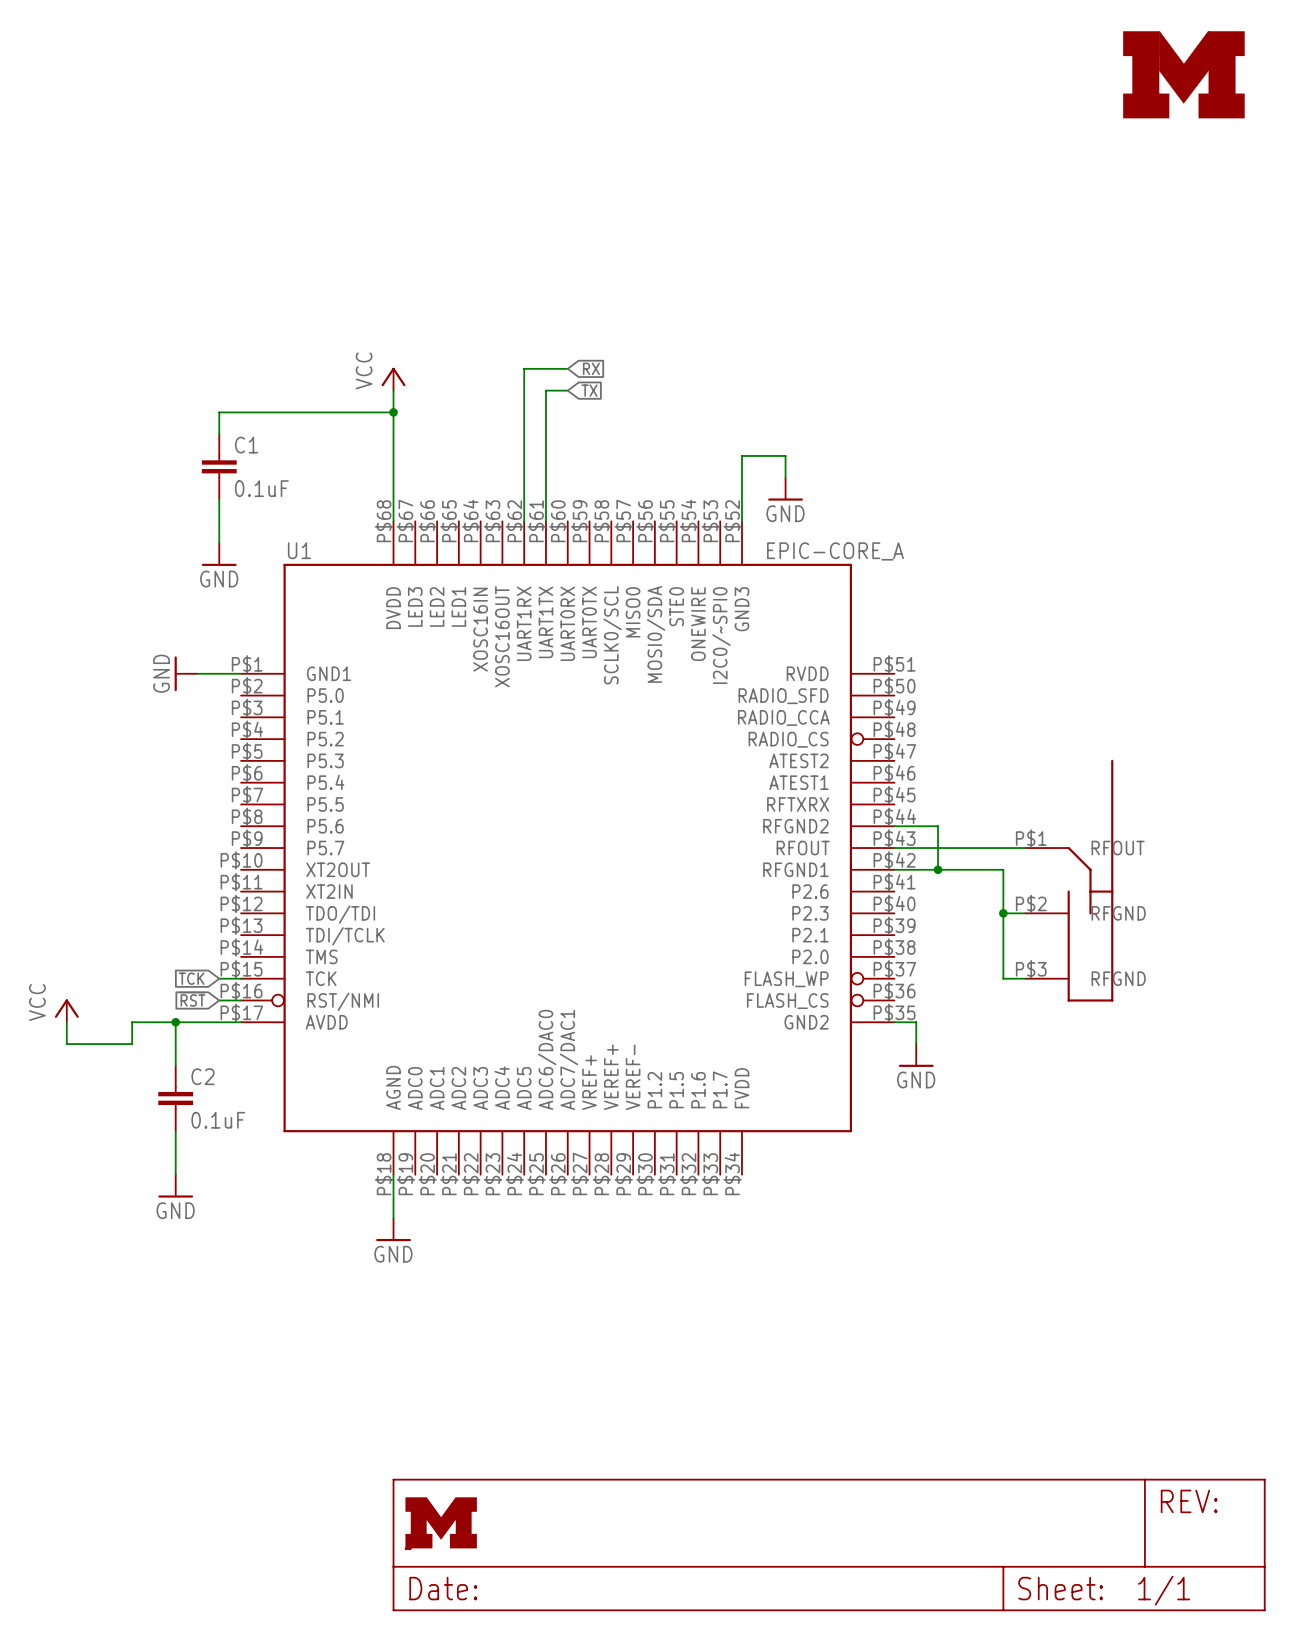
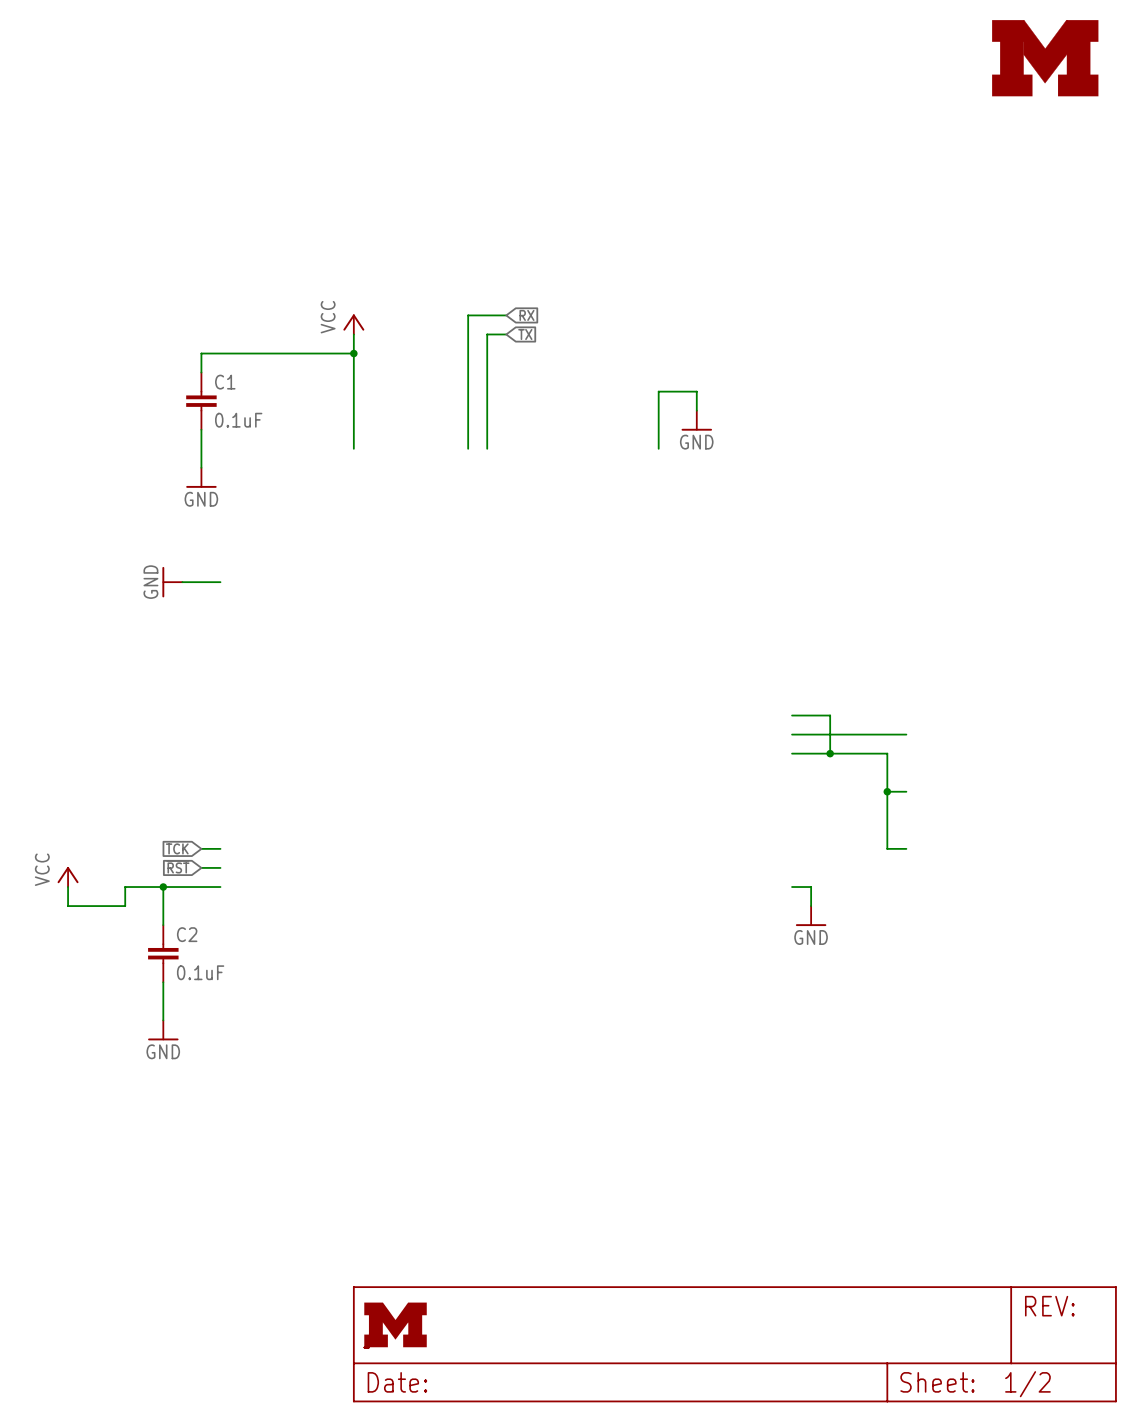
U1: EPIC-CORE_A (567, 848) -> none
part: (1069, 880) -> none
wire: (393, 1174) (393, 1218) -> none
power symbol: GND (393, 1229) -> none
part text: 1/1 (1164, 1590) -> 1/2 (1027, 1384)

